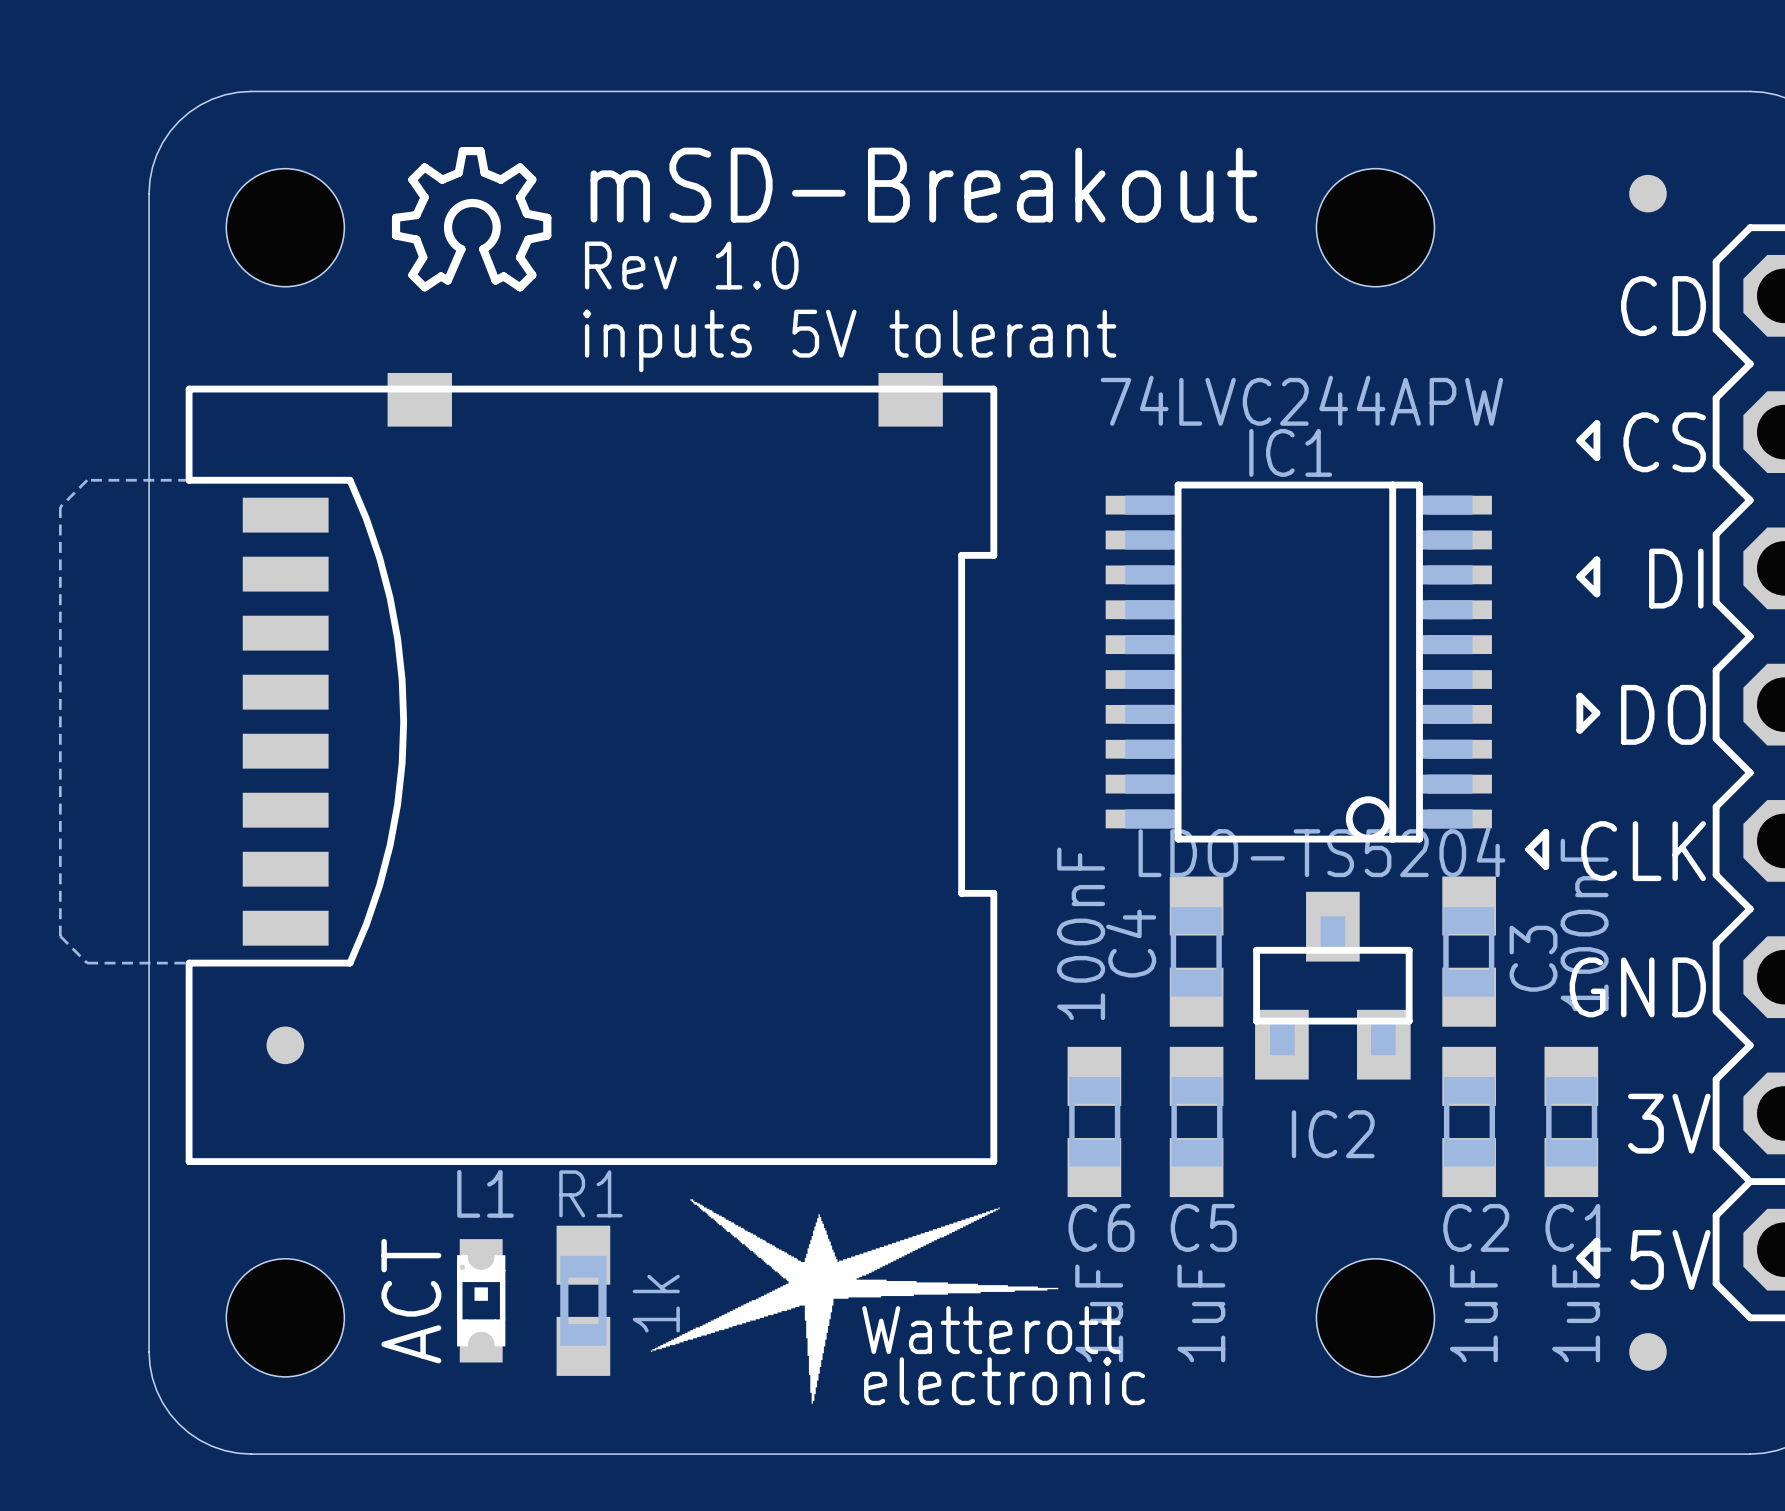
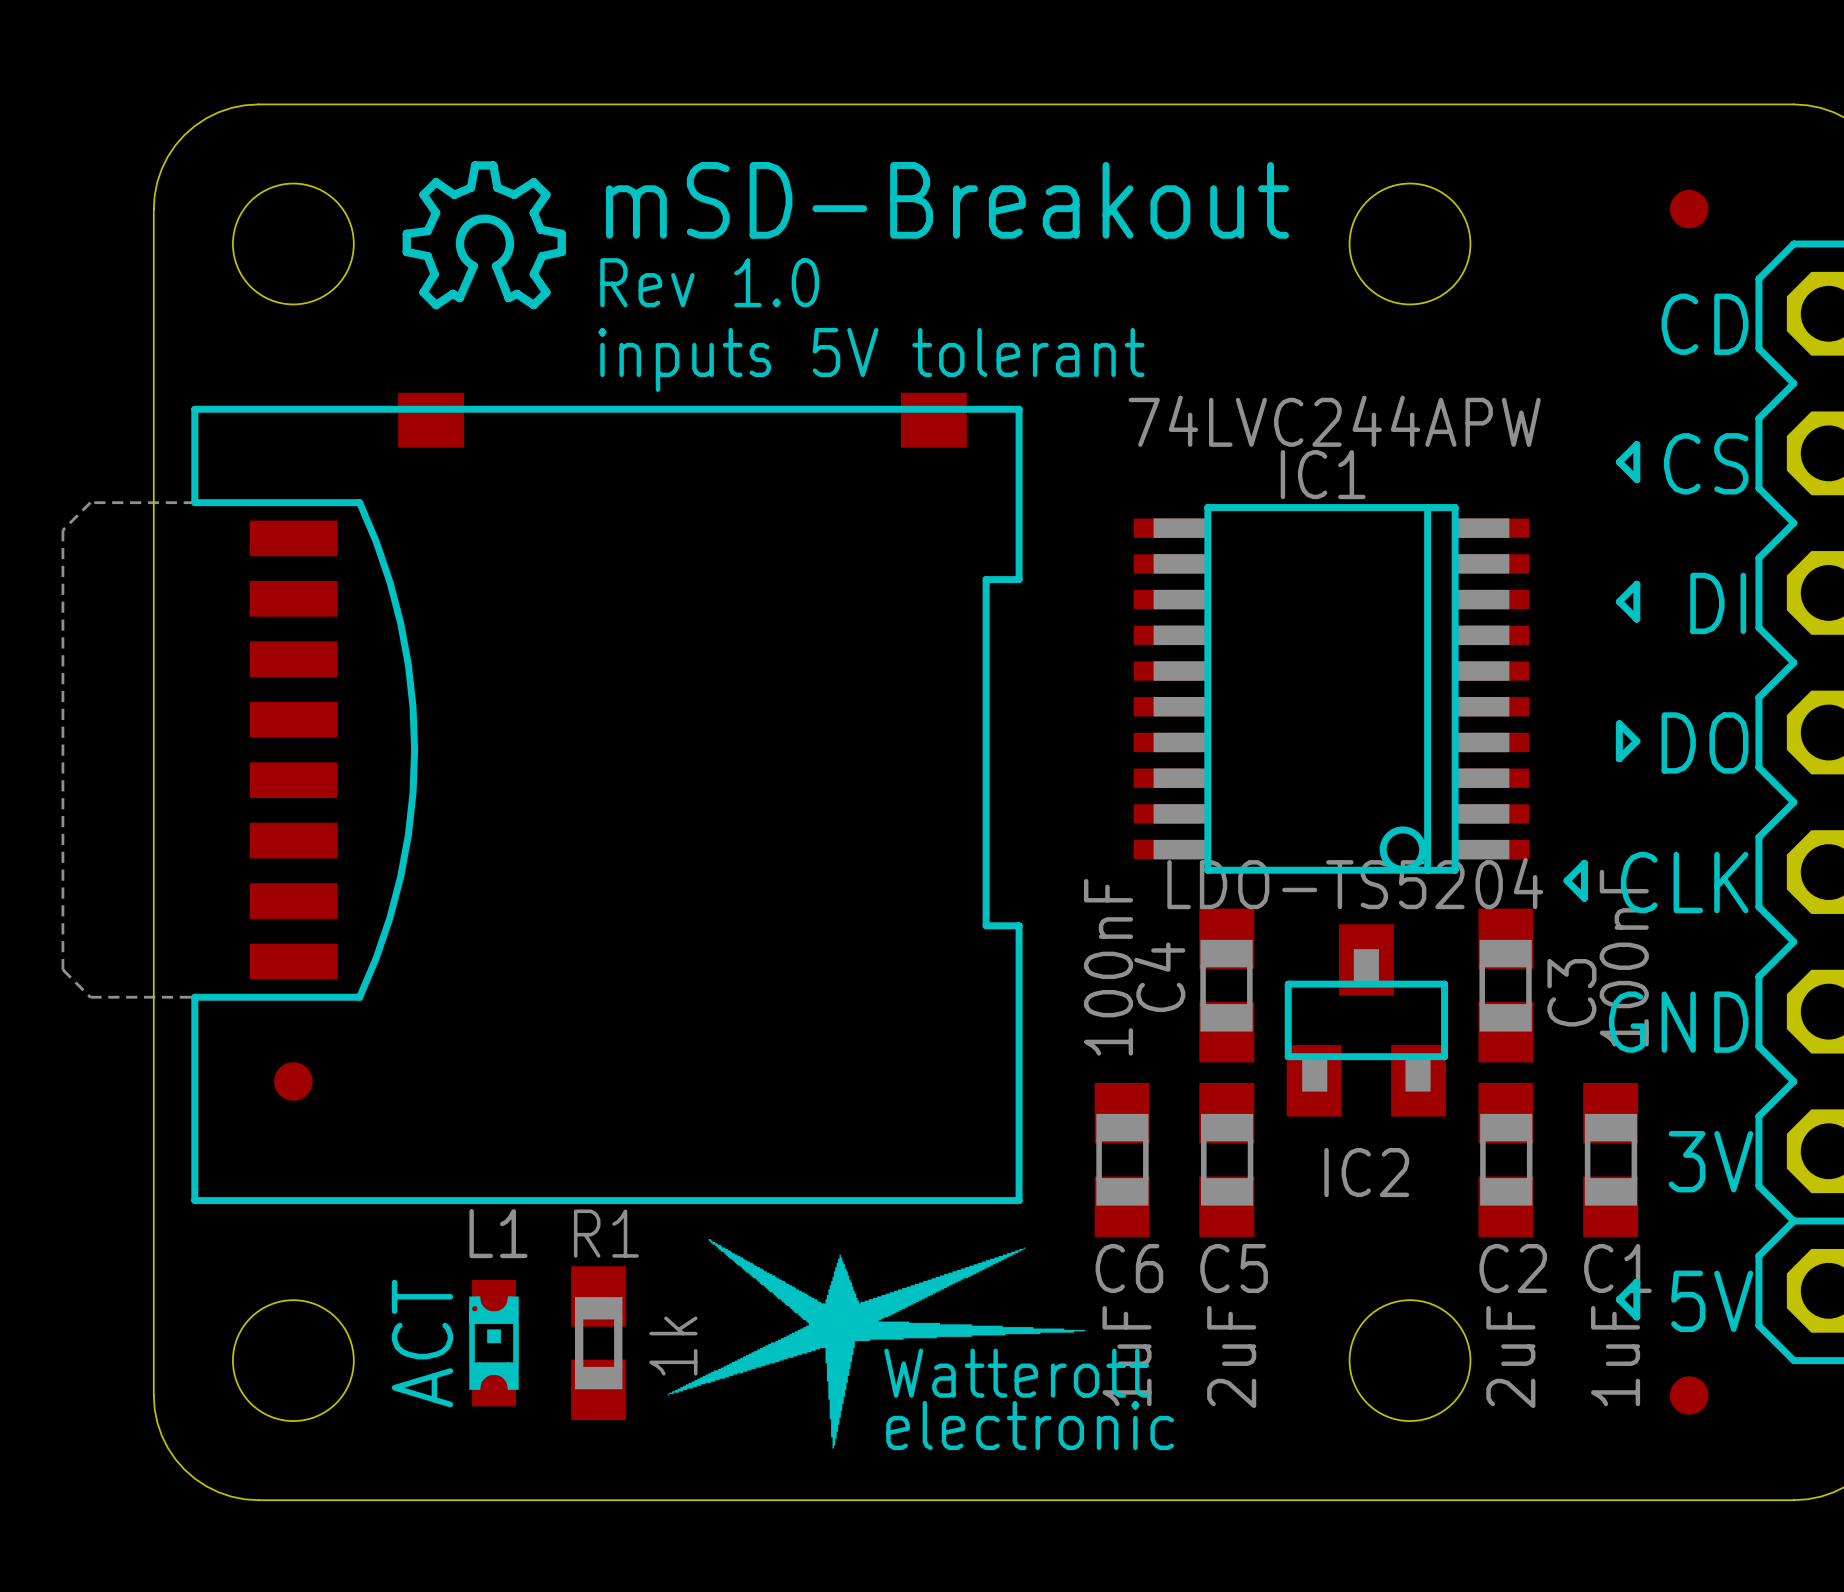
C5 value: 1uF (1201, 1313) -> 2uF (1231, 1357)
C2 value: 1uF (1473, 1313) -> 2uF (1510, 1357)

